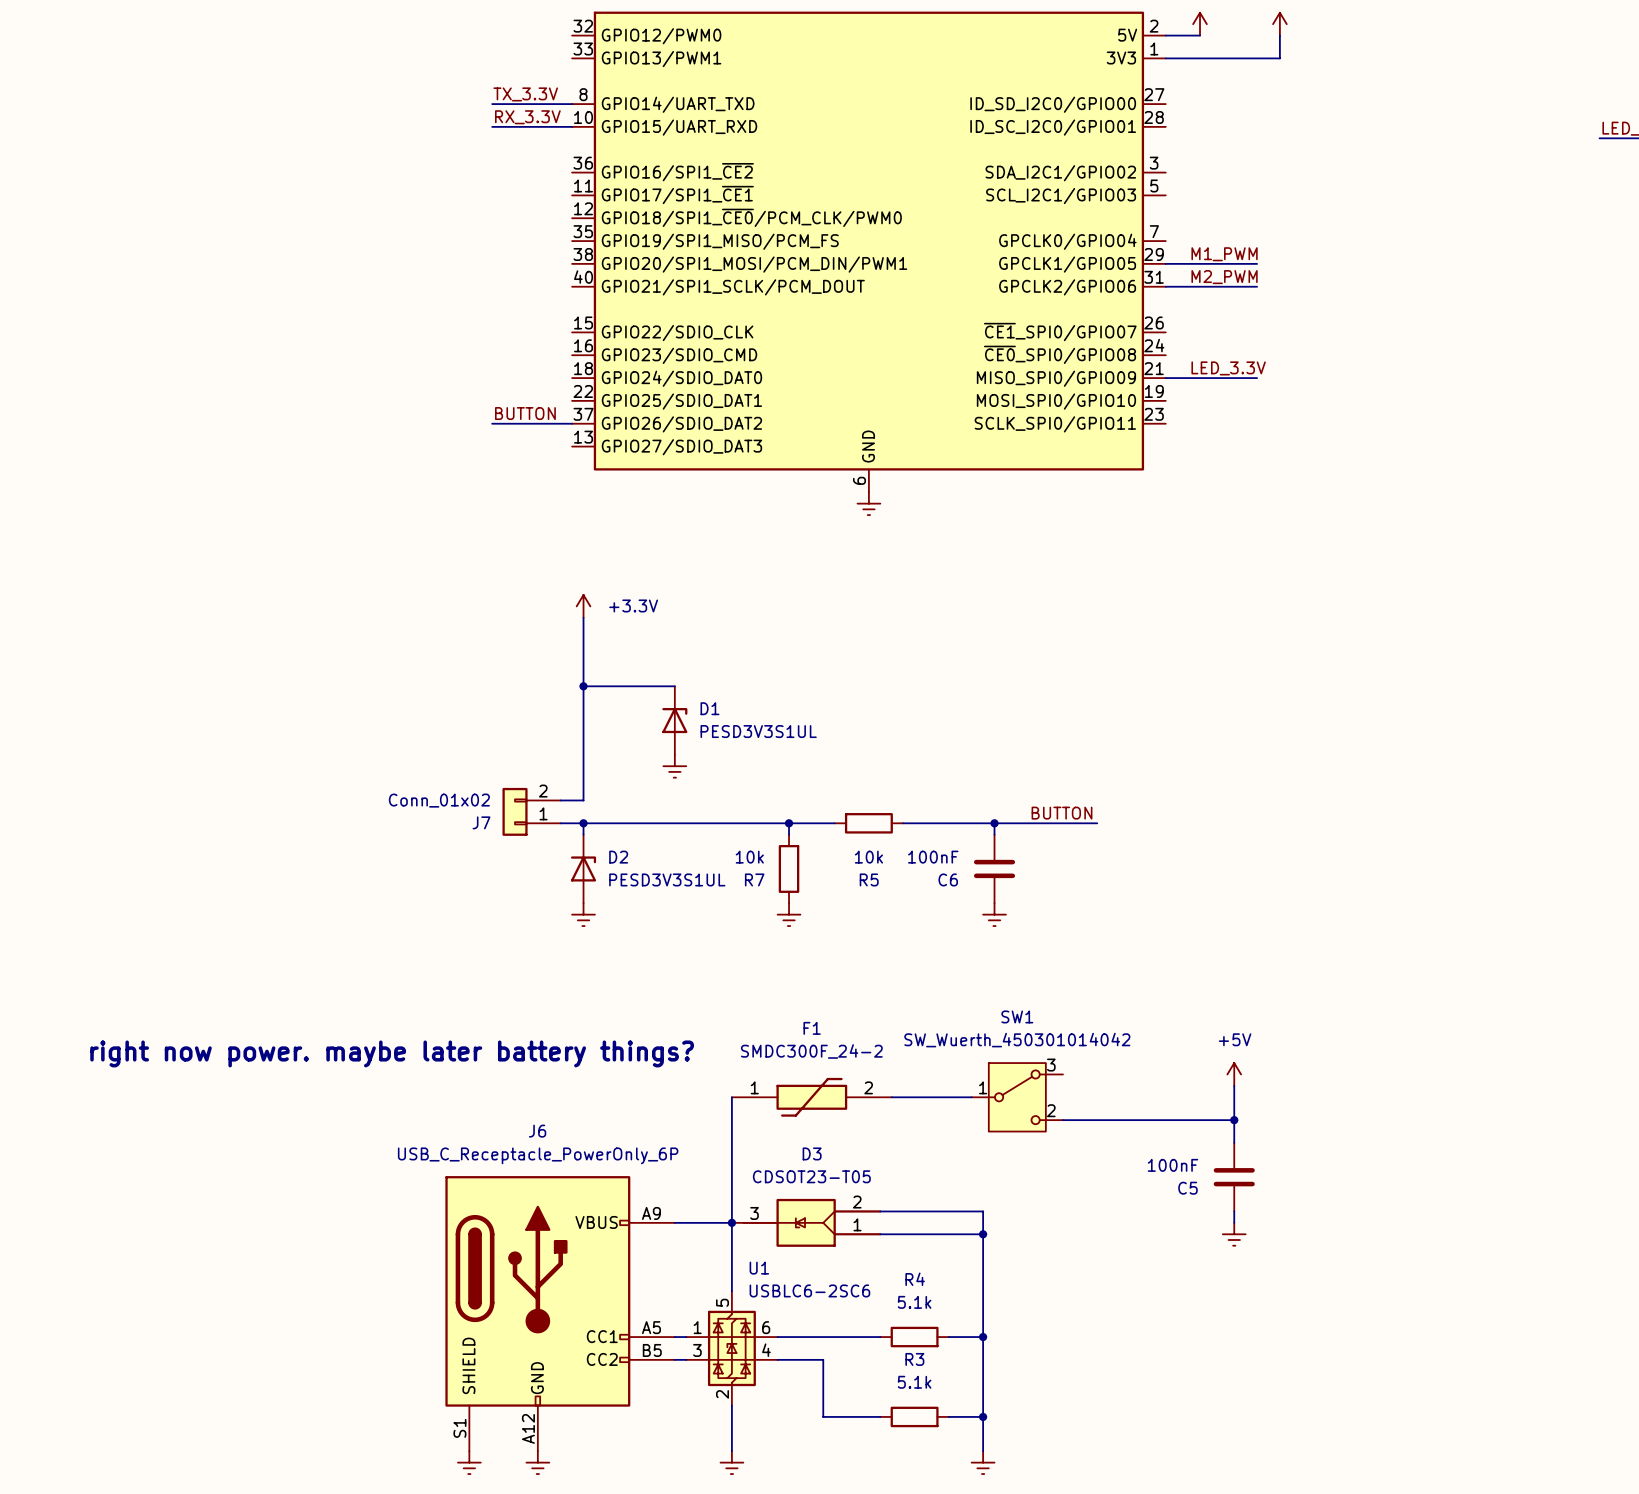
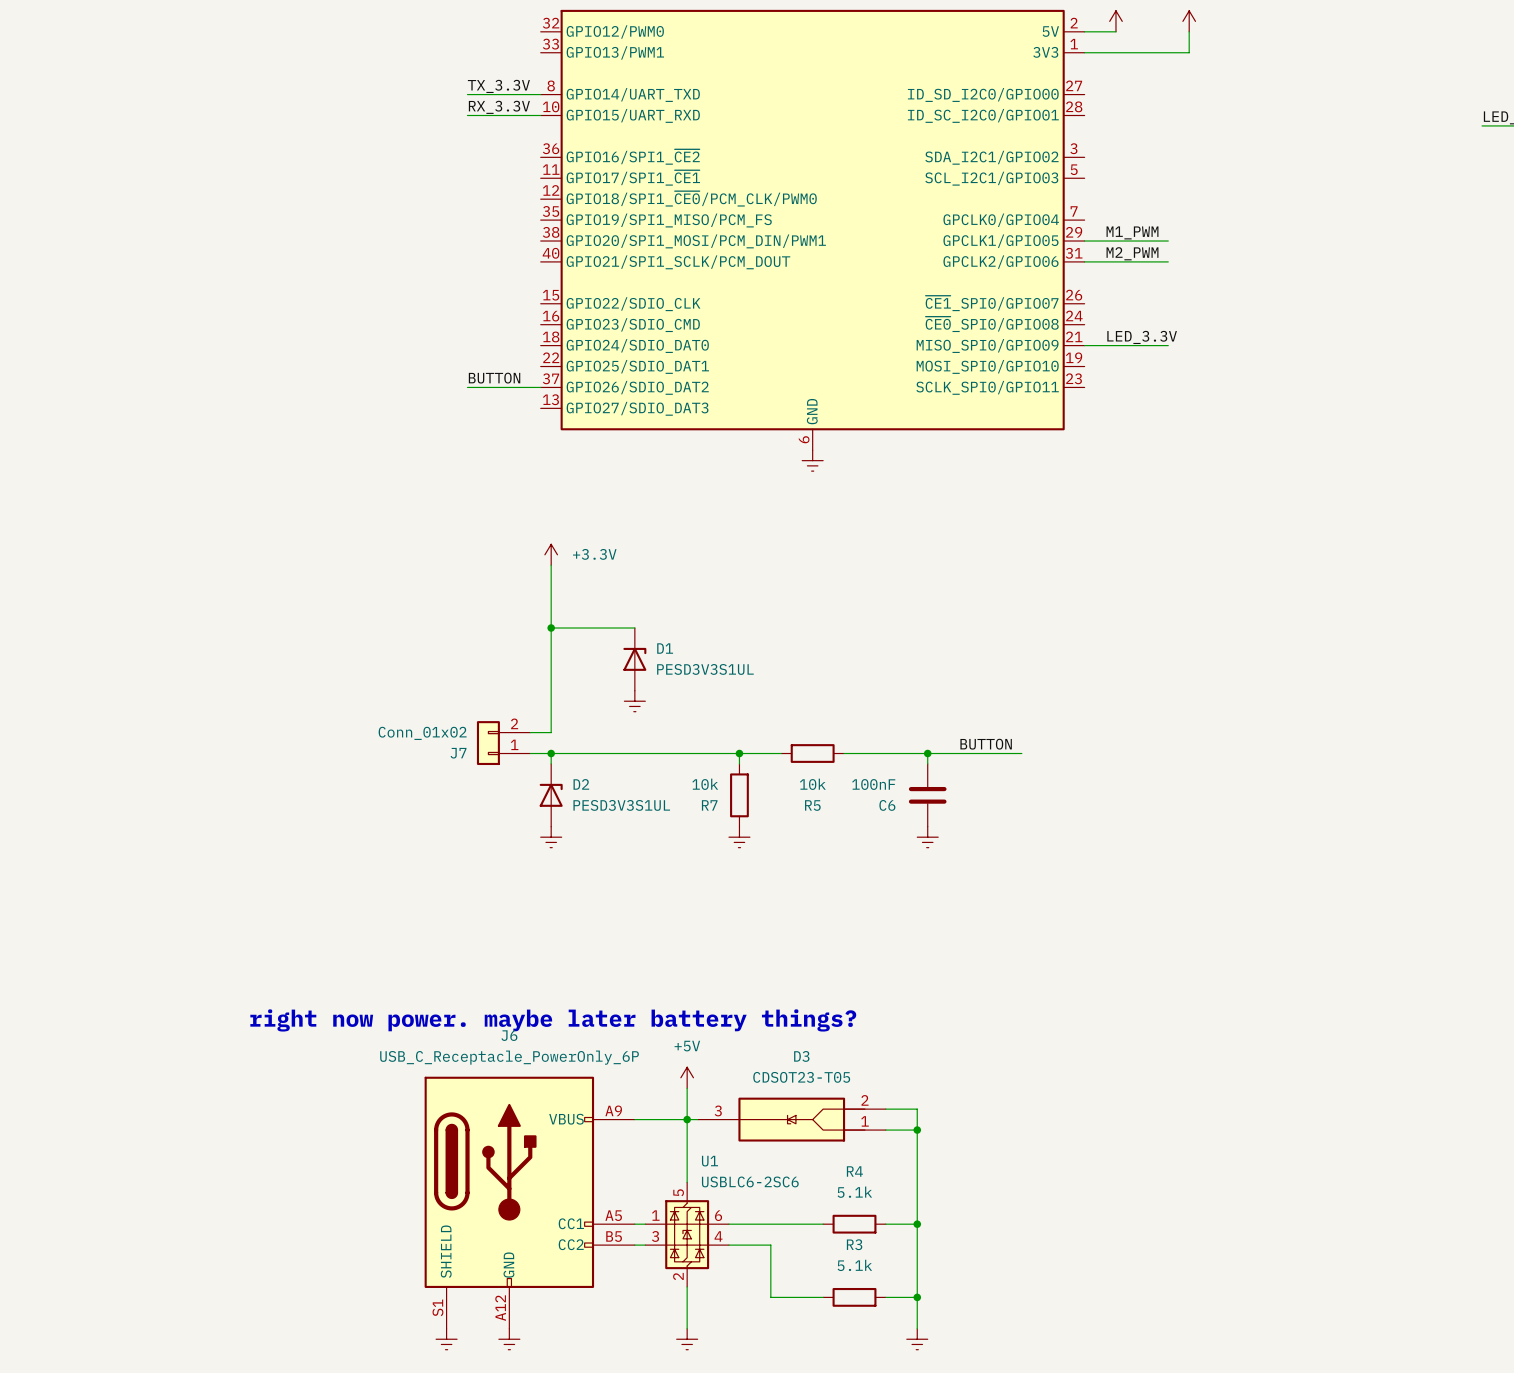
text position: right now power. maybe later battery things? (392, 1053) -> right now power. maybe later battery things? (553, 1020)
power symbol: +5V (1234, 1074) -> none
wire: (1234, 1085) (1234, 1142) -> none
wire: (731, 1097) (731, 1188) -> none
F1: SMDC300F_24-2 (811, 1097) -> none
wire: (891, 1097) (971, 1097) -> none
SW1: SW_Wuerth_450301014042 (1017, 1097) -> none
wire: (1063, 1120) (1234, 1120) -> none
junction: (1234, 1120) -> none
power symbol: none -> +5V (687, 1077)
C5: 100nF (1234, 1177) -> none
D3 symbol: [731, 1198, 881, 1247] -> [697, 1097, 886, 1142]
wire: (1234, 1211) (1234, 1222) -> none
power symbol: (1234, 1234) -> none

